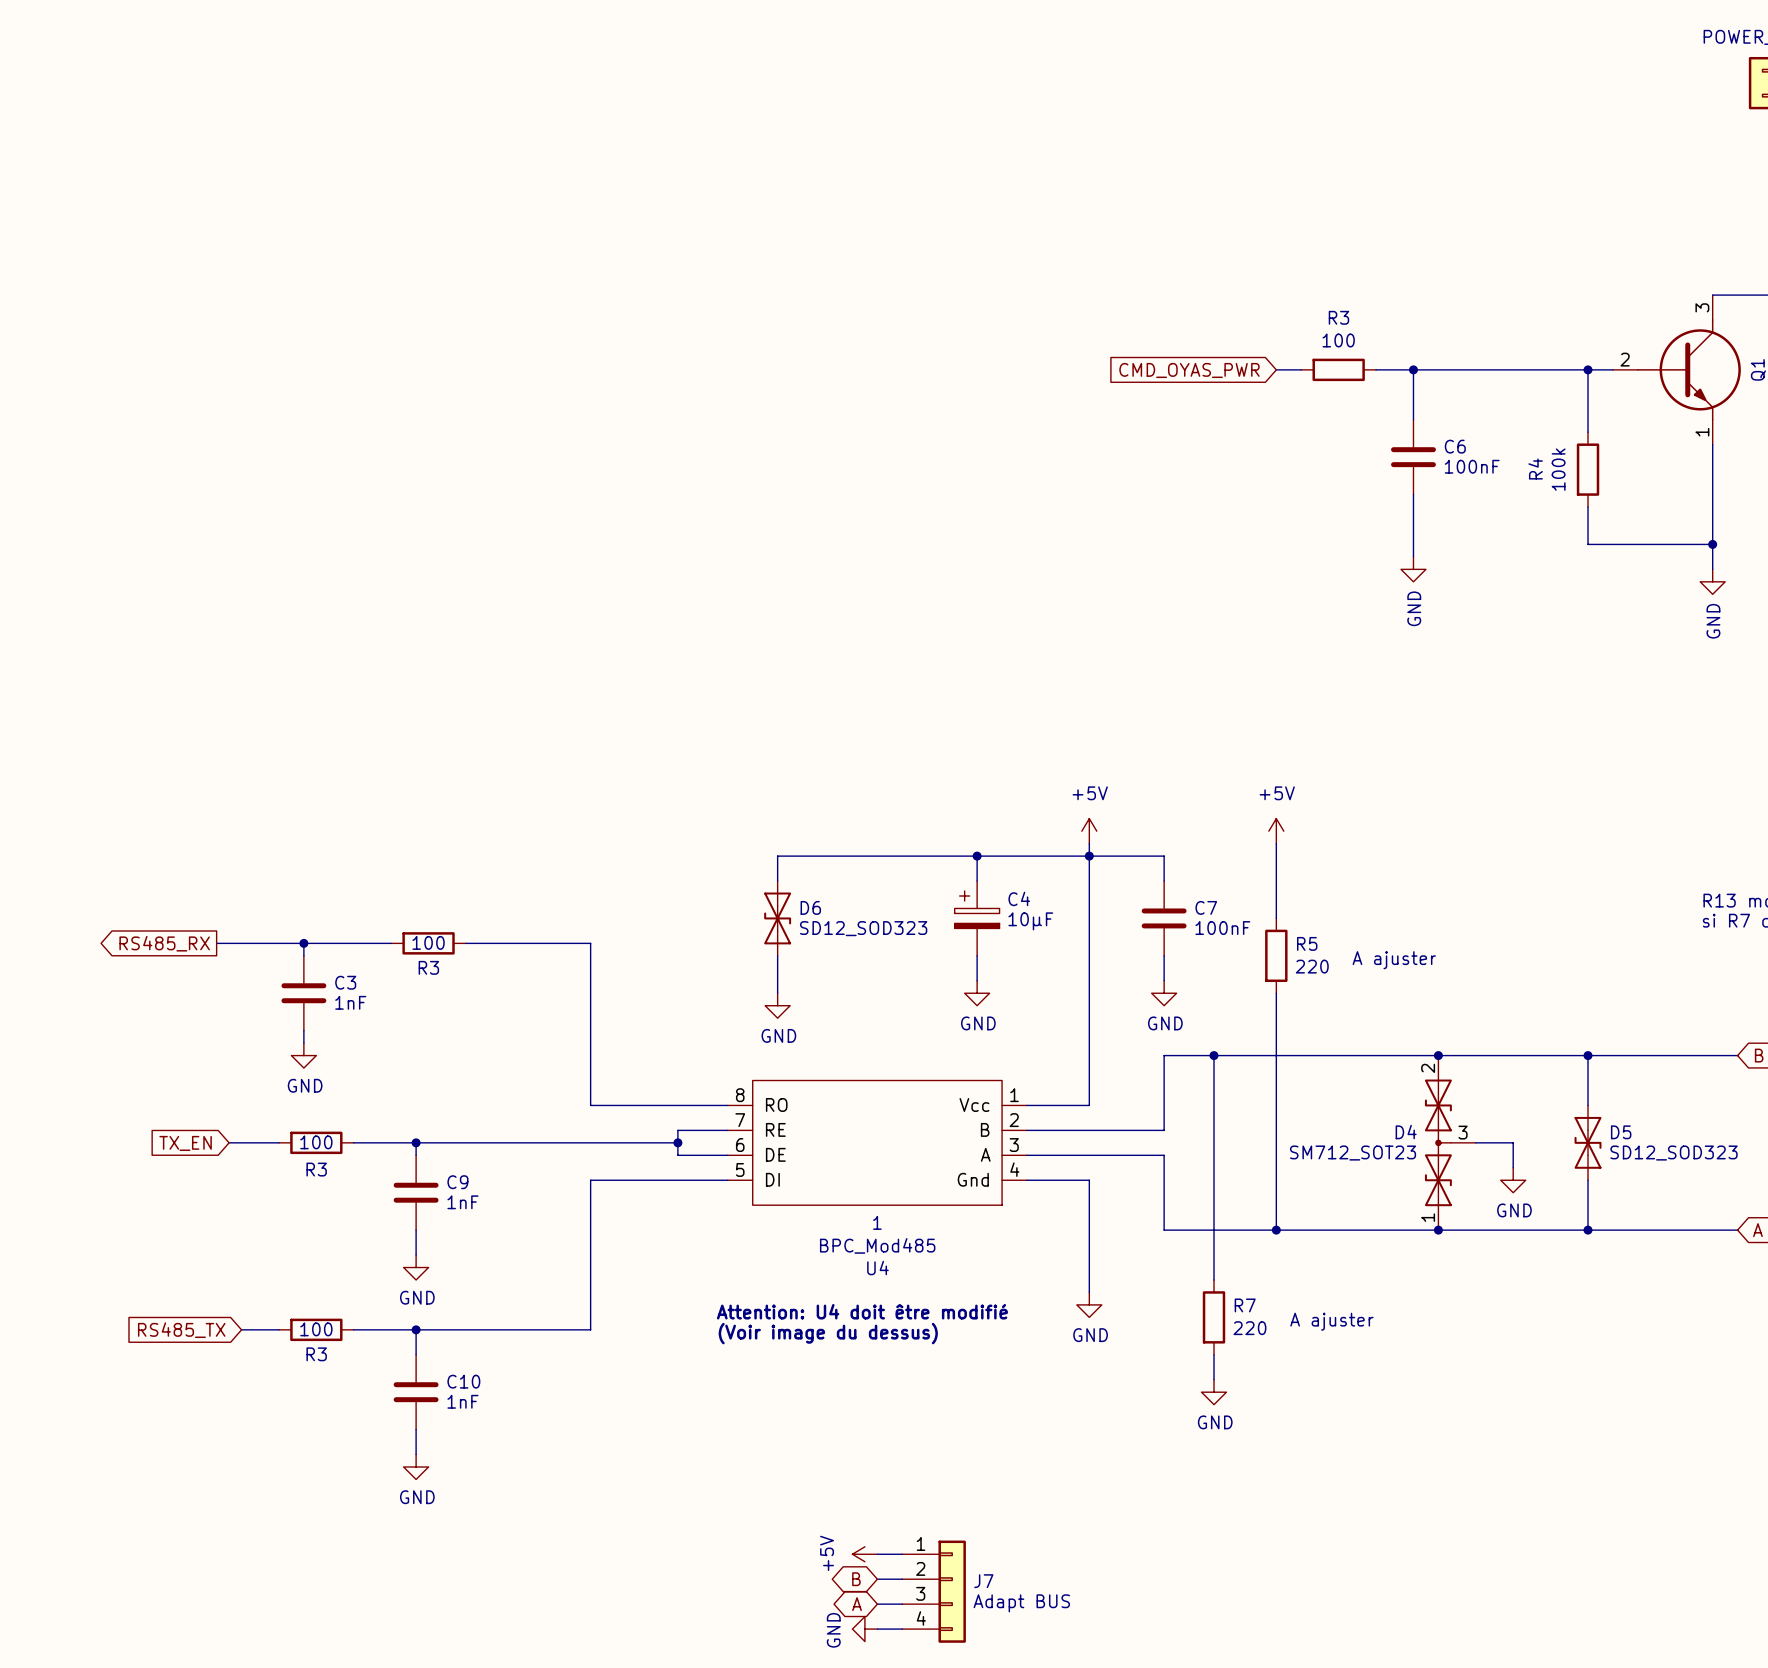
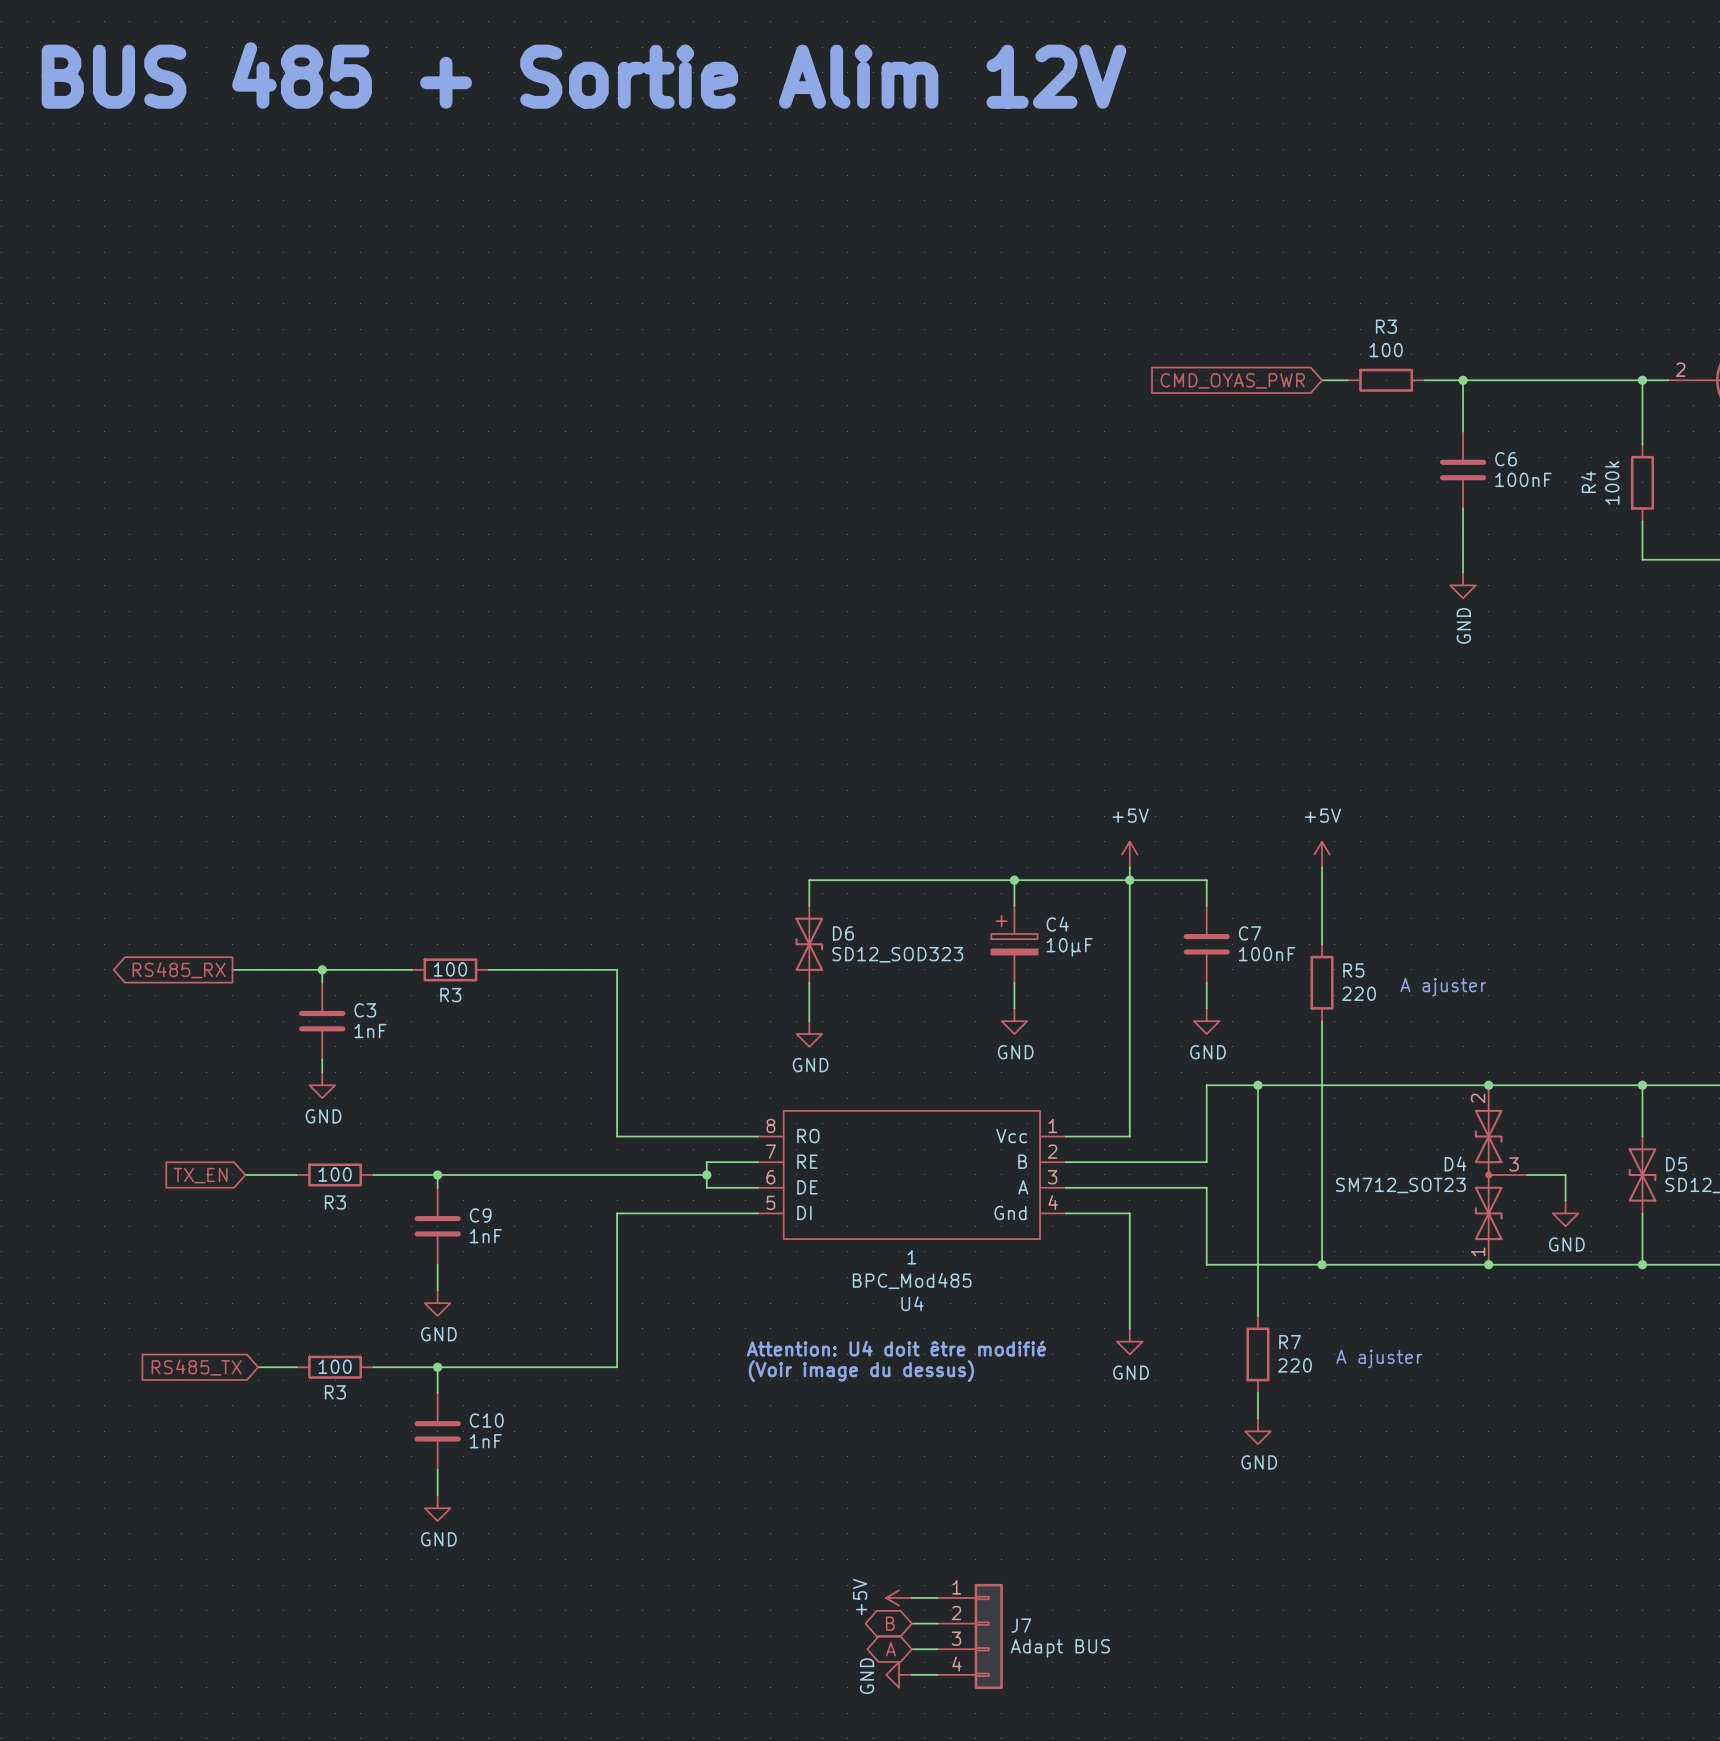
text: none -> BUS 485 + Sortie Alim 12V (584, 75)

